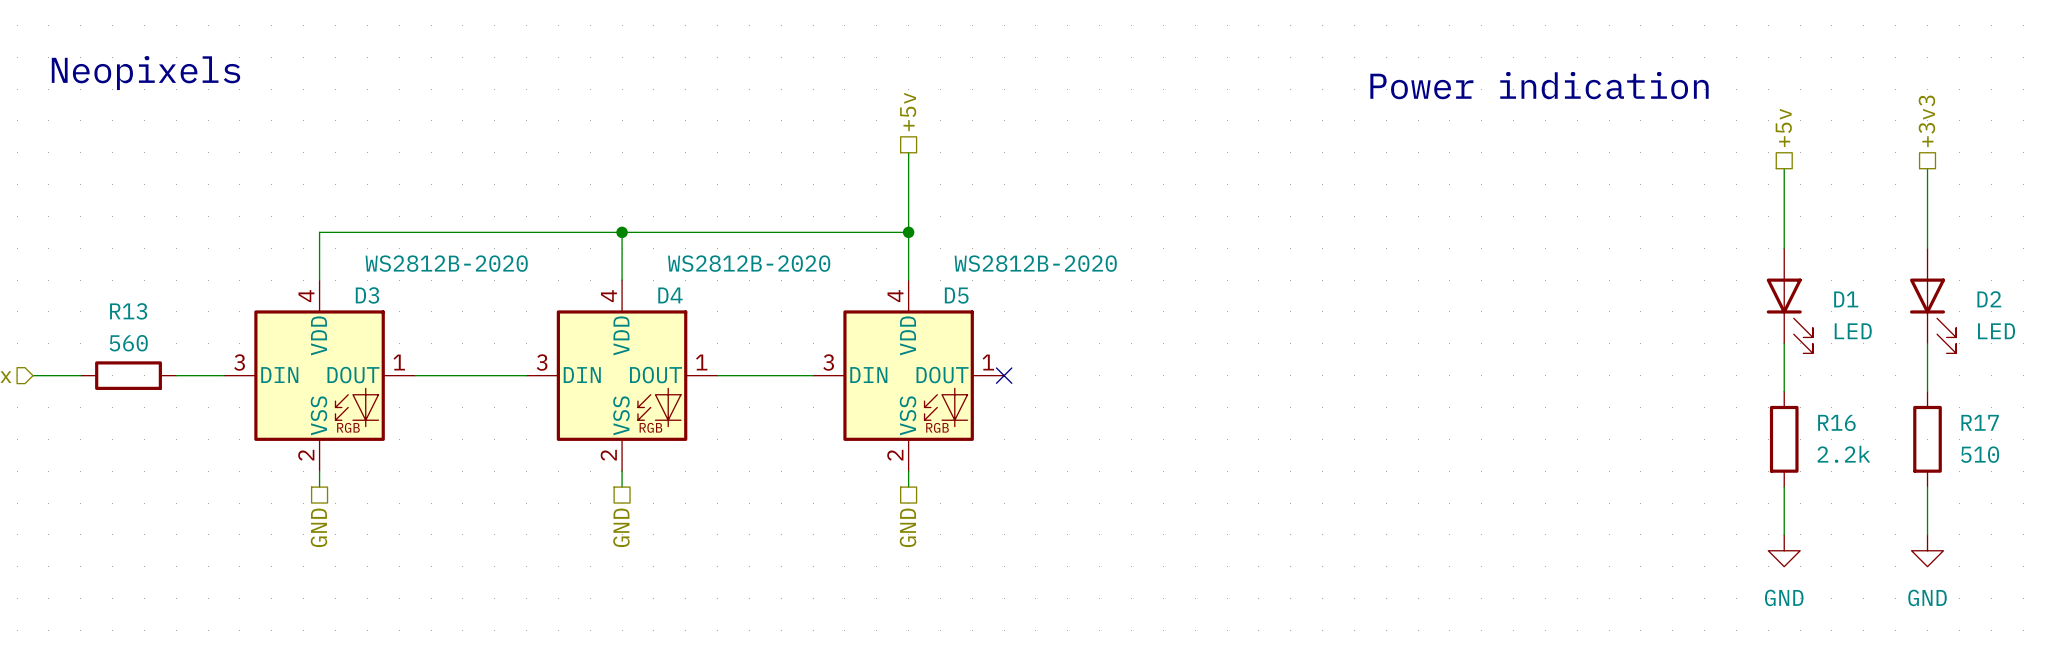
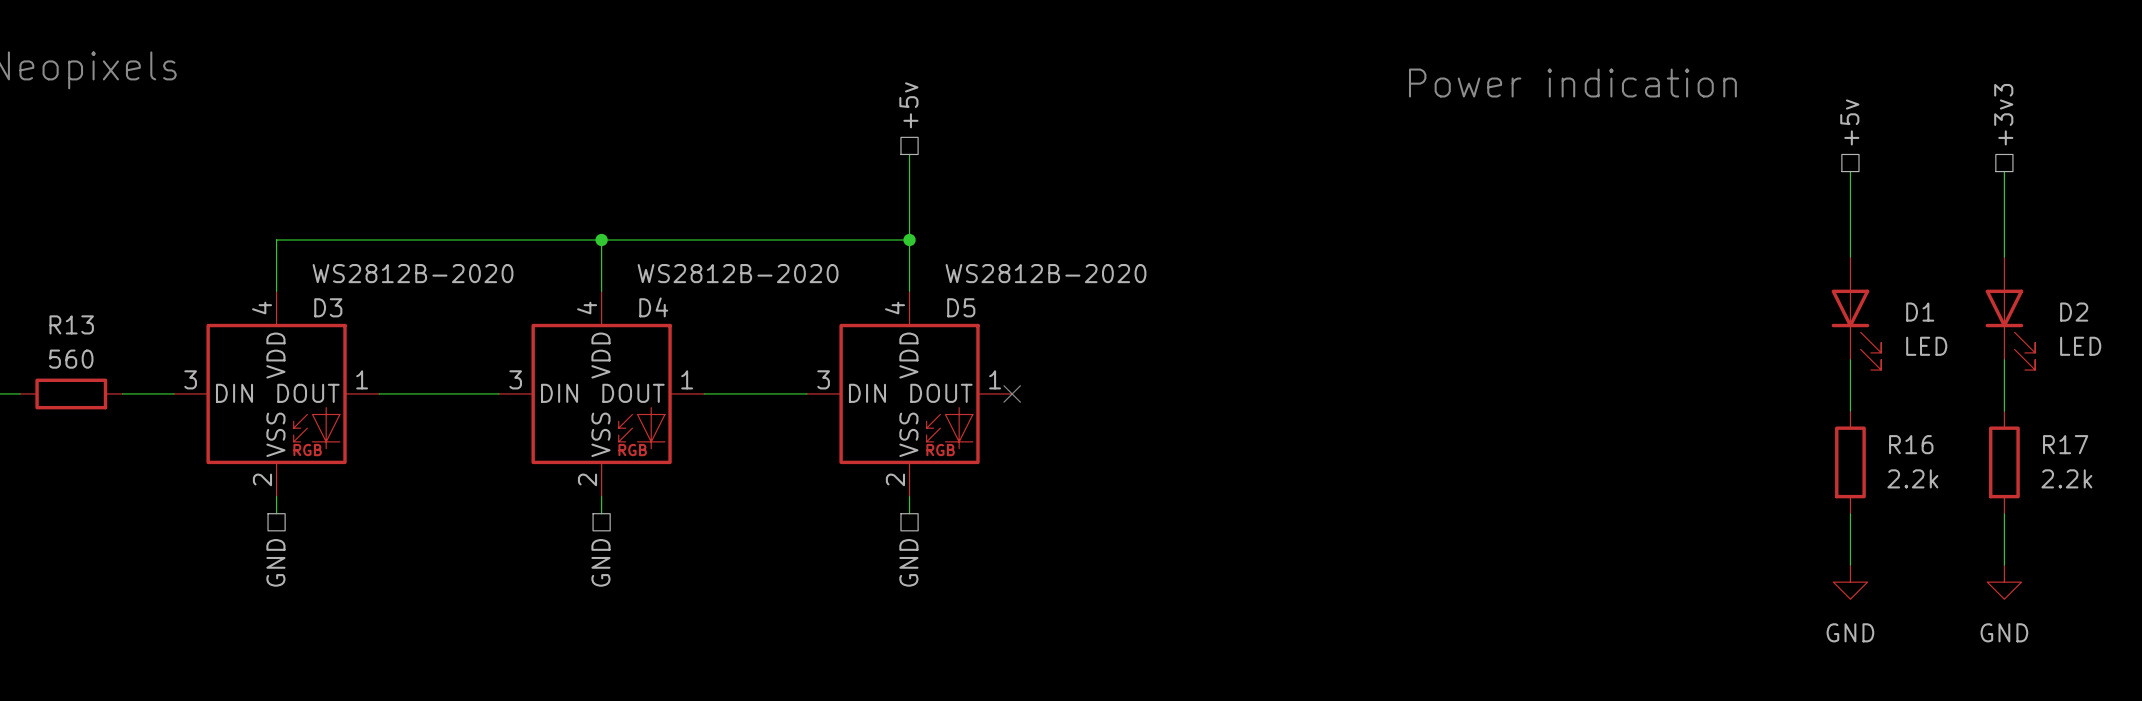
R17 value: 510 (1980, 454) -> 2.2k (2066, 478)

